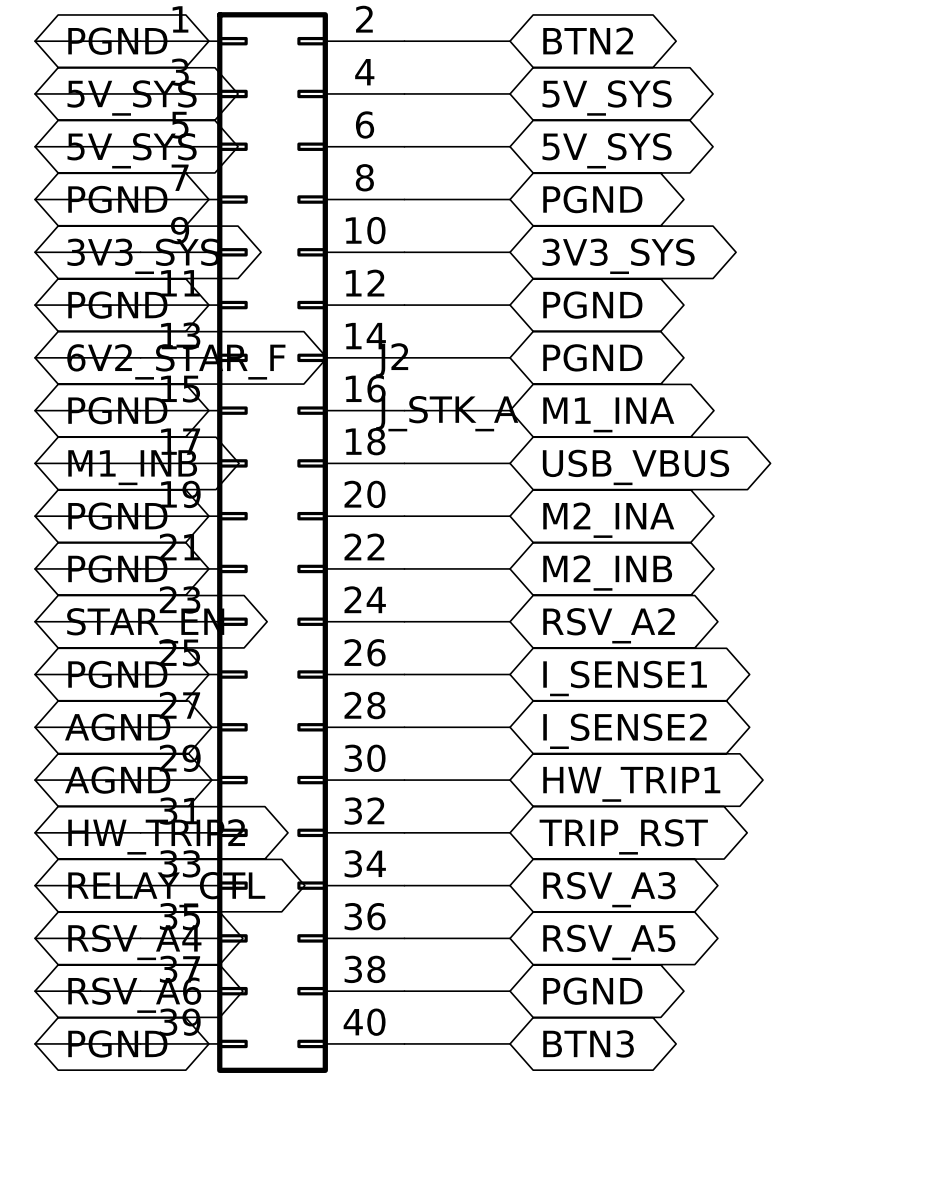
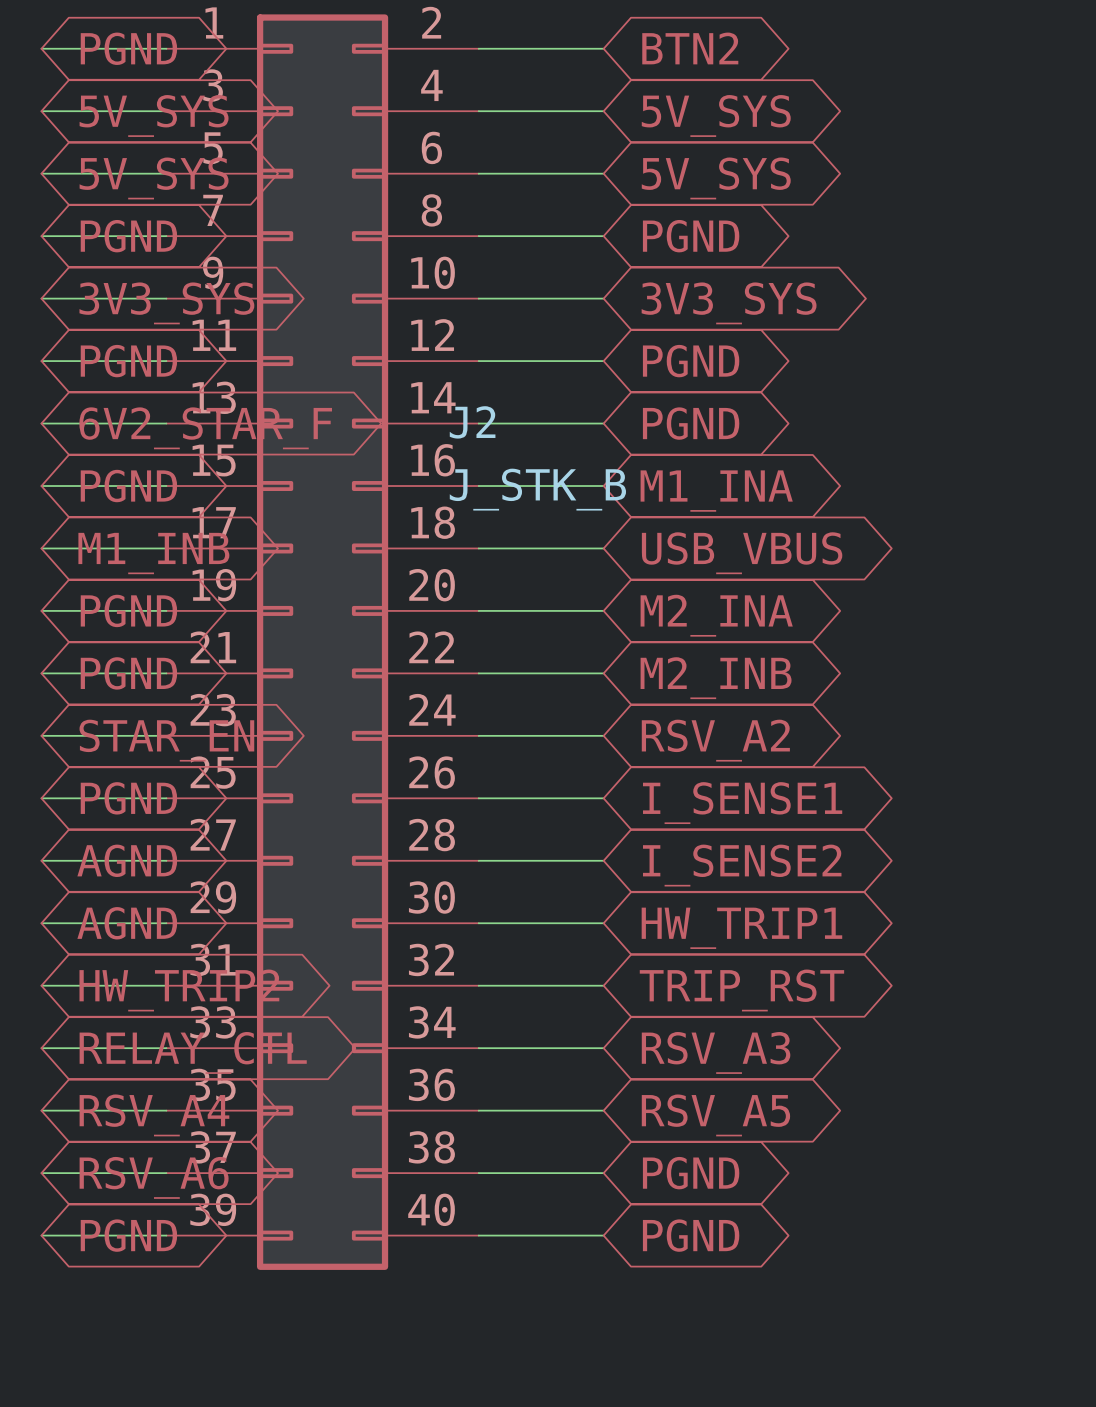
J2 value: J_STK_A (447, 413) -> J_STK_B (537, 489)
global label: BTN3 (588, 1043) -> PGND (691, 1235)

